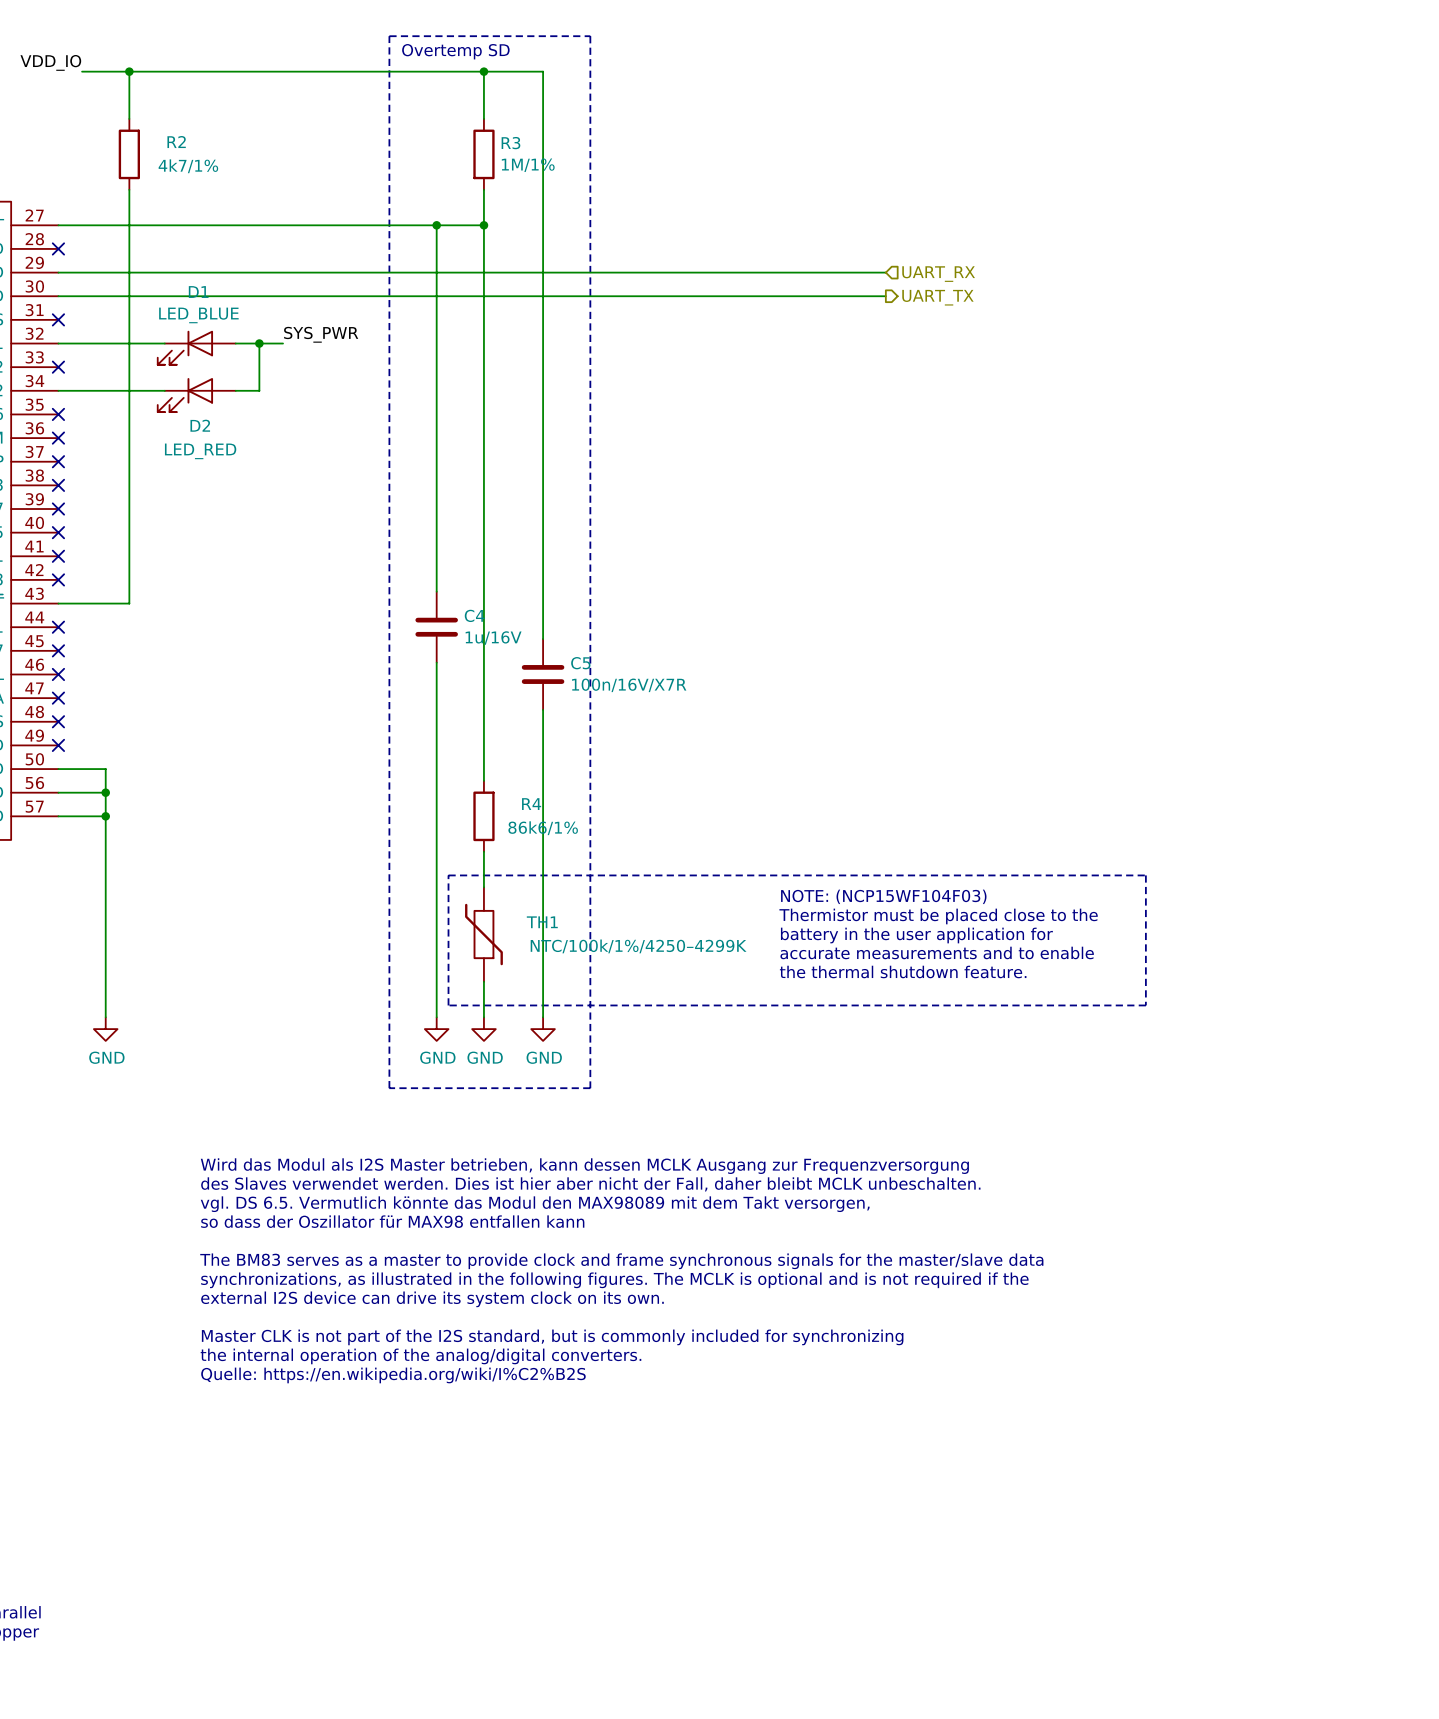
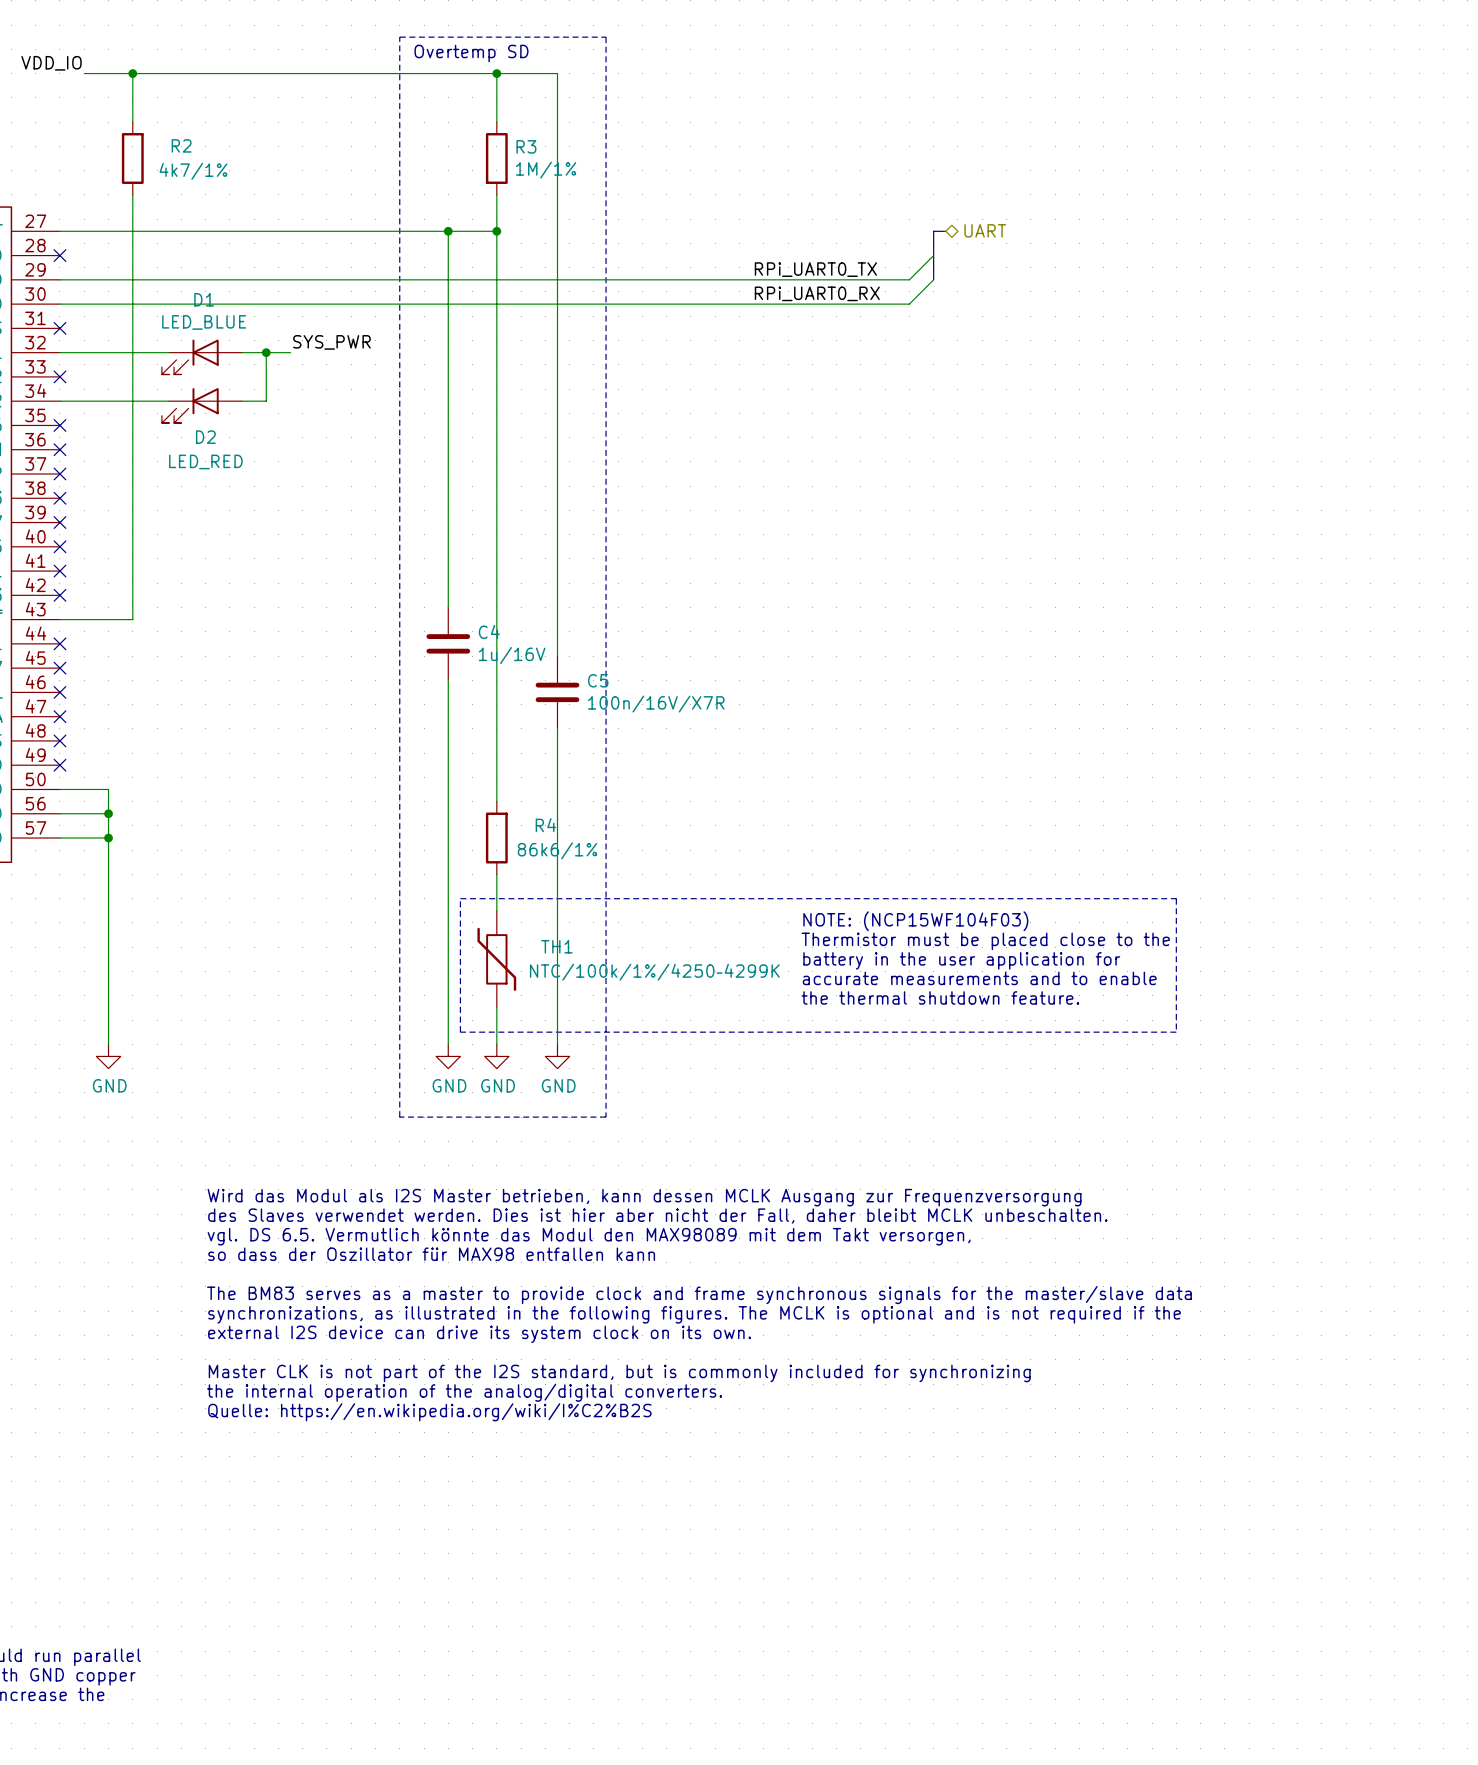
hierarchical label: none -> UART (985, 230)
bus: none -> (945, 231) (933, 231) (933, 279)
wire: none -> (933, 255) (909, 279)
label: none -> RPi_UART0_TX (815, 269)
wire: none -> (933, 279) (909, 304)
hierarchical label: UART_RX (938, 274) -> none
label: none -> RPi_UART0_RX (817, 293)
hierarchical label: UART_TX (937, 297) -> none

